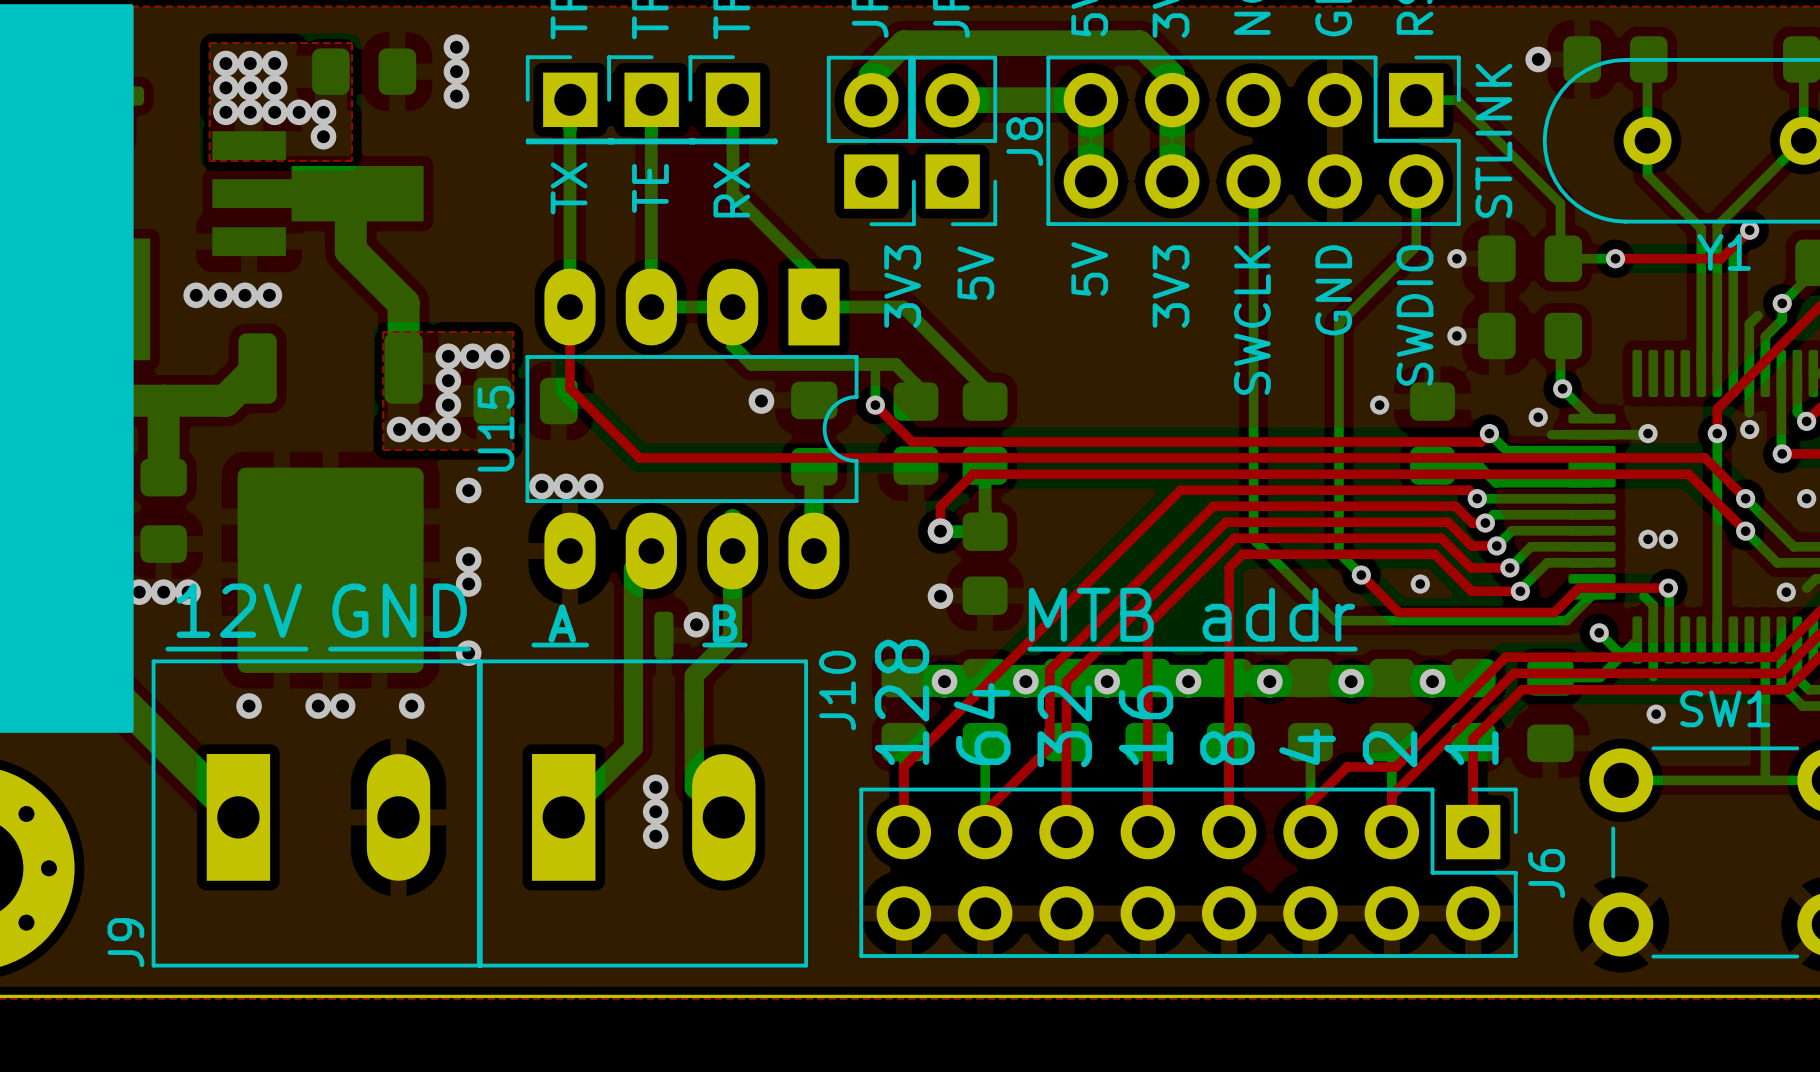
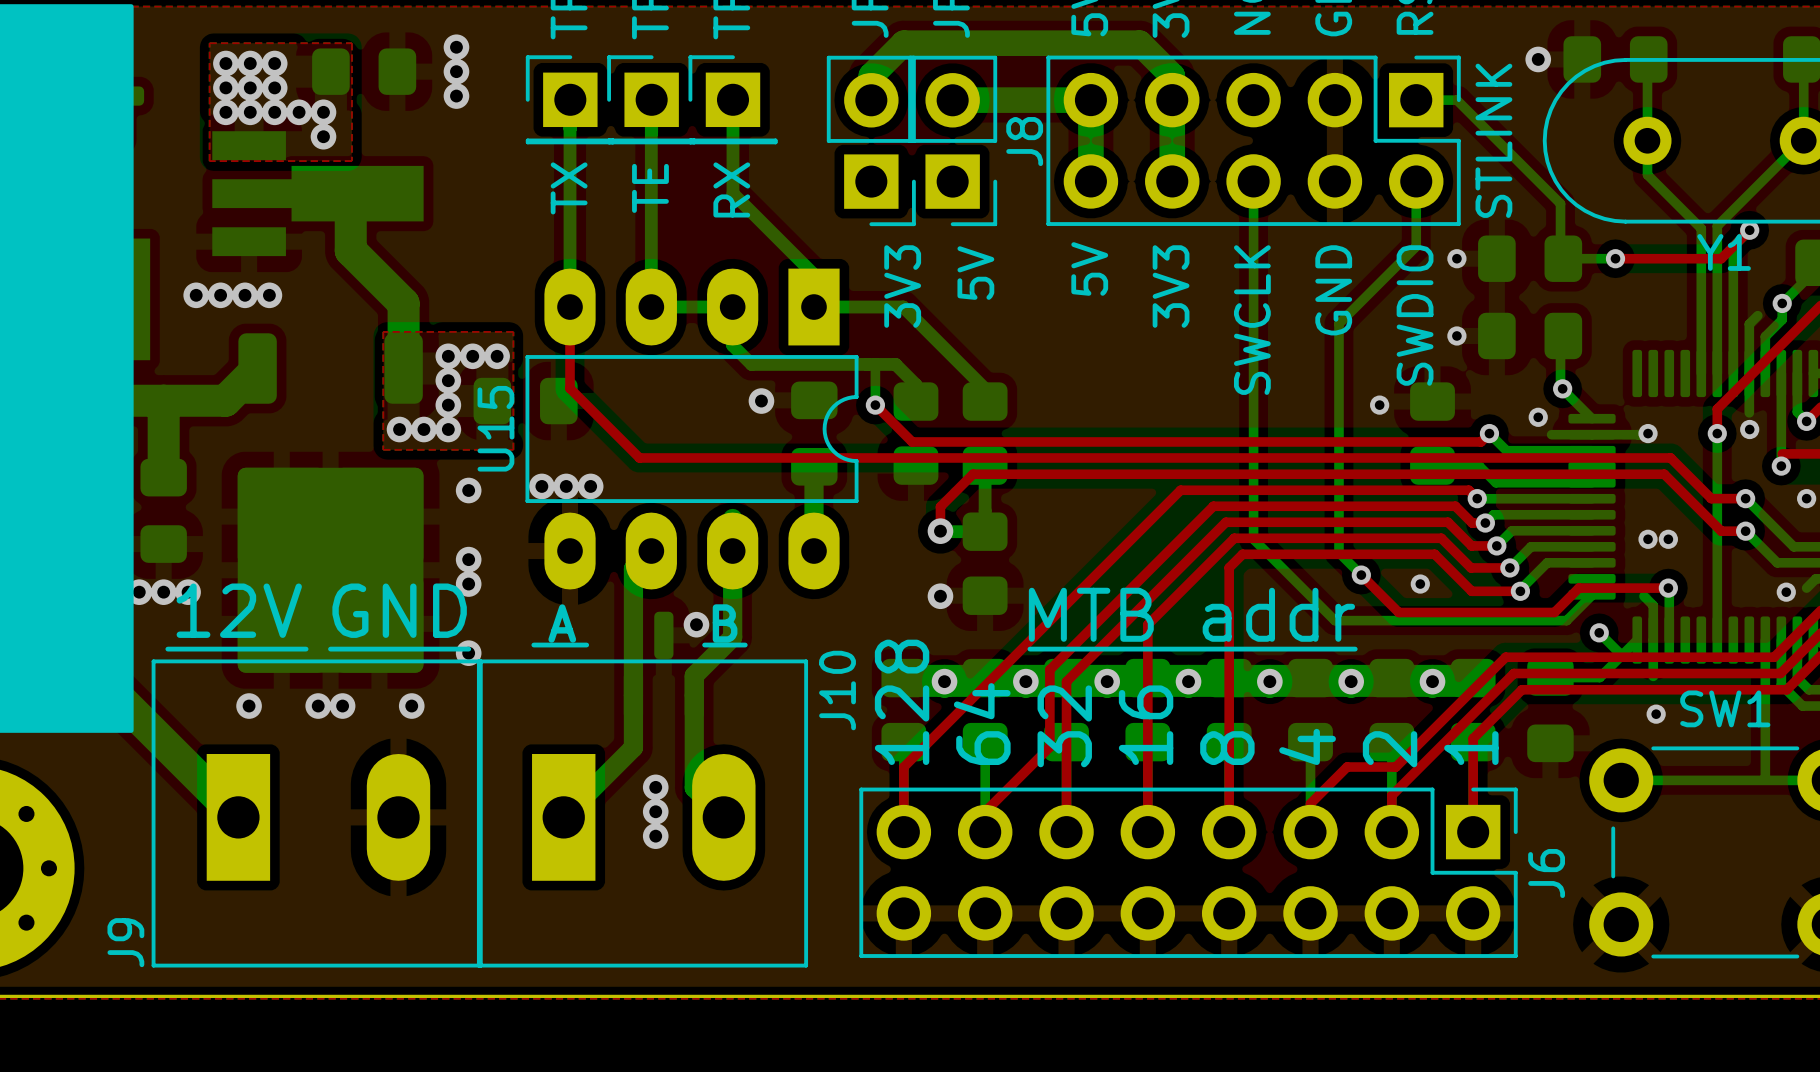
via position: (1782, 453) -> (1781, 466)
top track: (1670, 457) (1704, 457) (1745, 498) -> (1670, 457) (1711, 498) (1745, 498)
top track: (1664, 474) (1688, 474) (1745, 531) -> (1664, 474) (1721, 531) (1745, 531)

